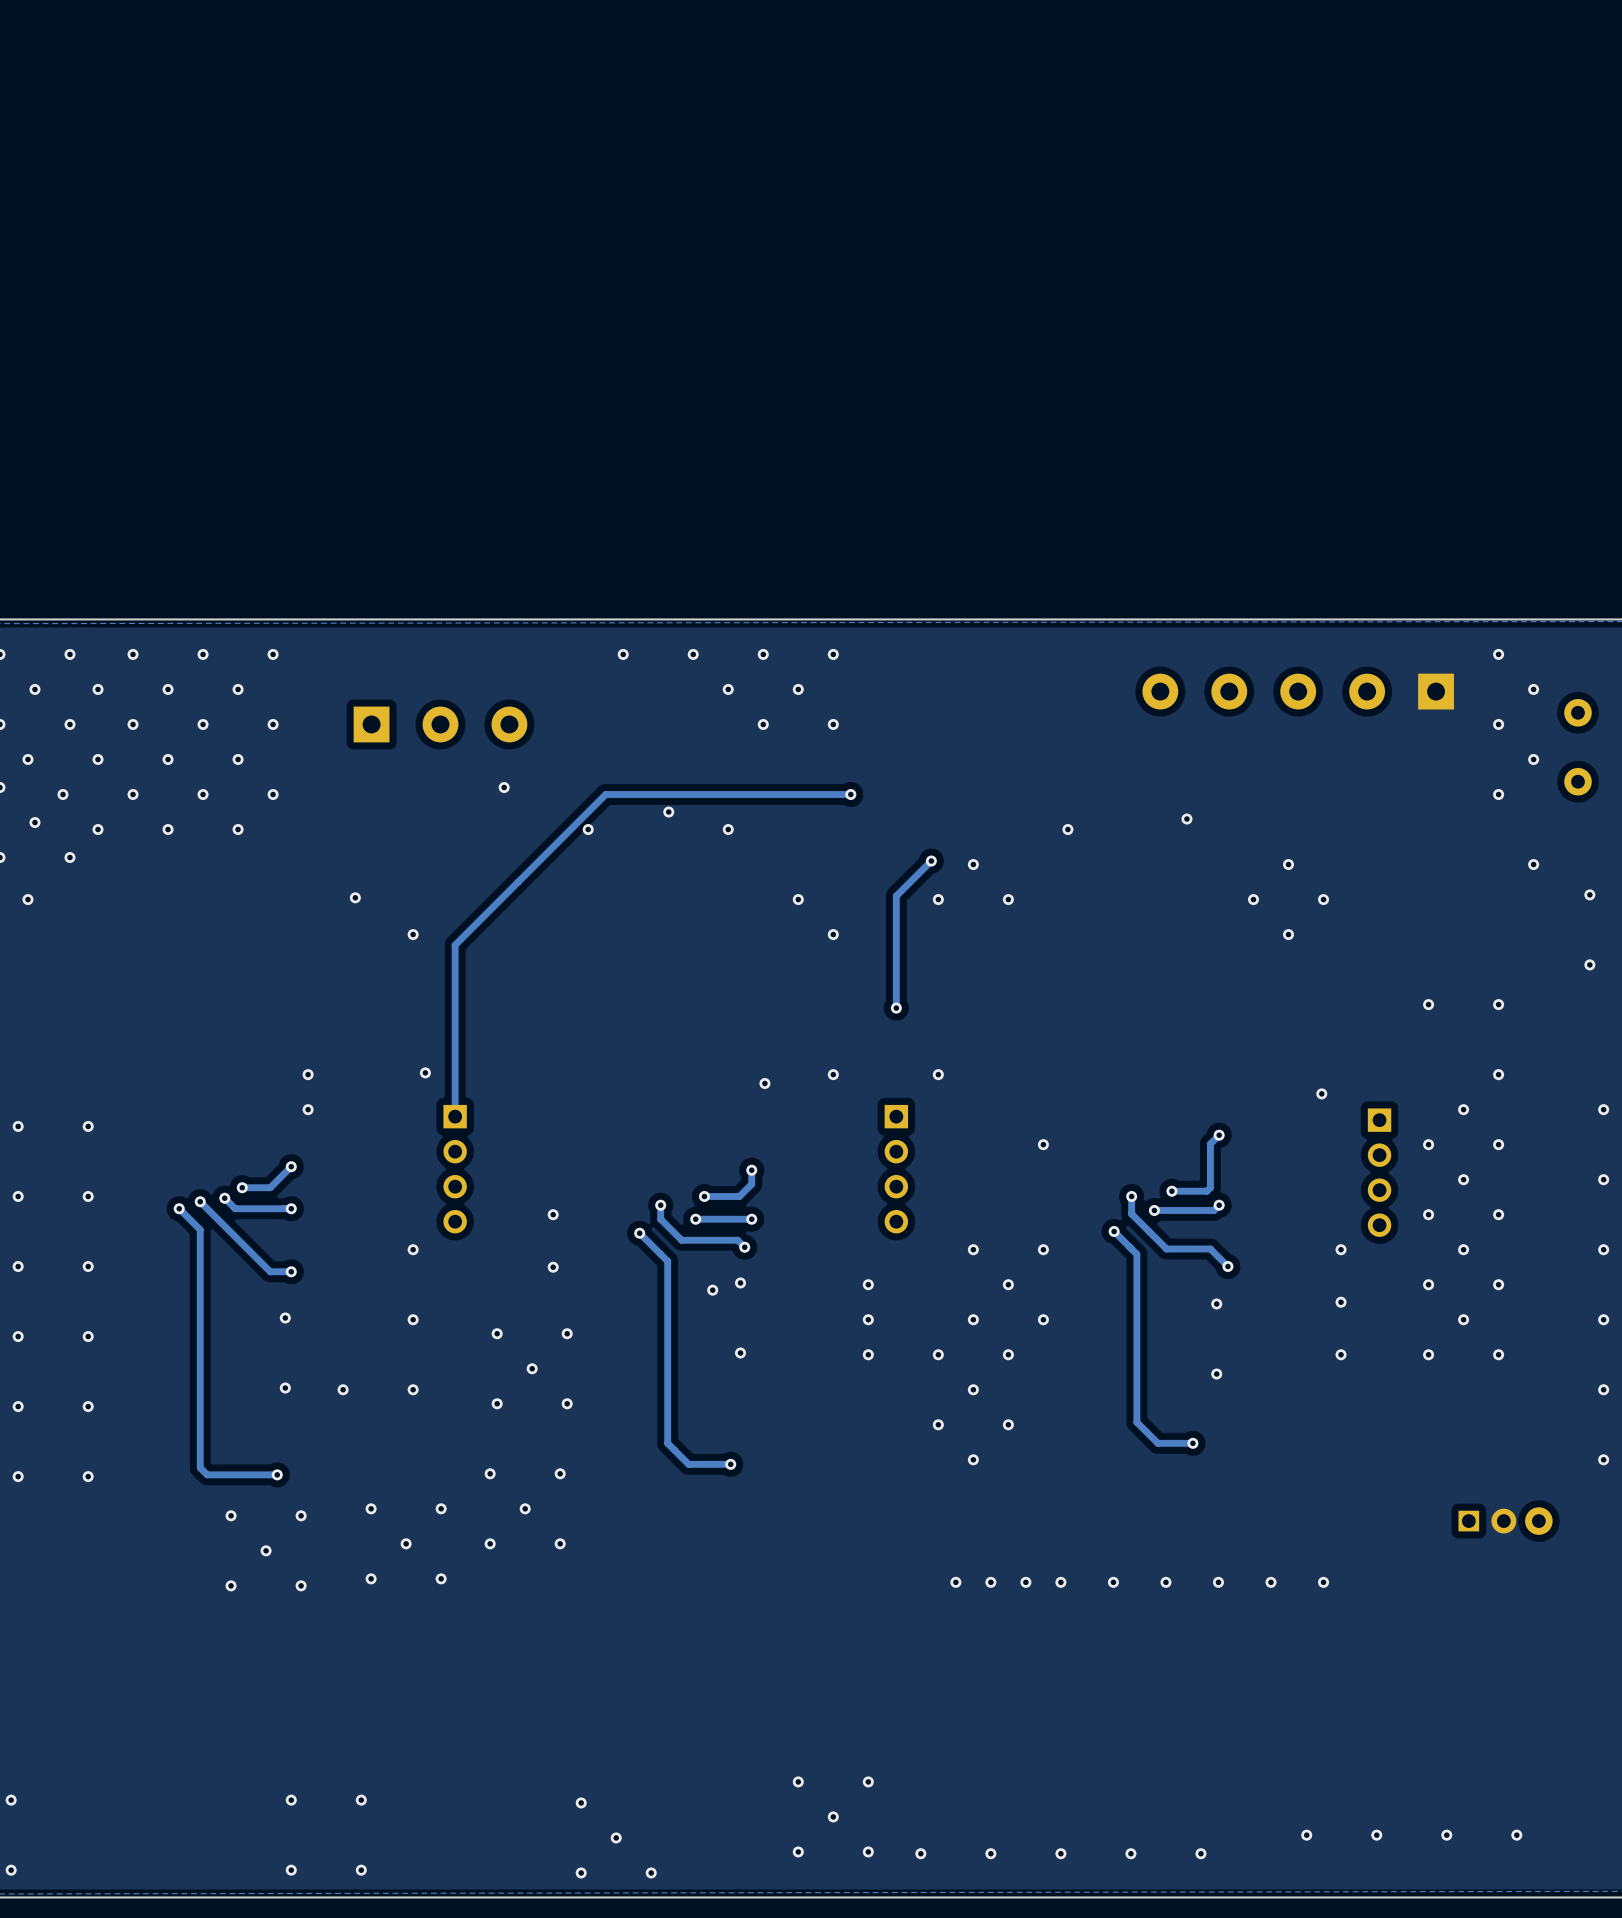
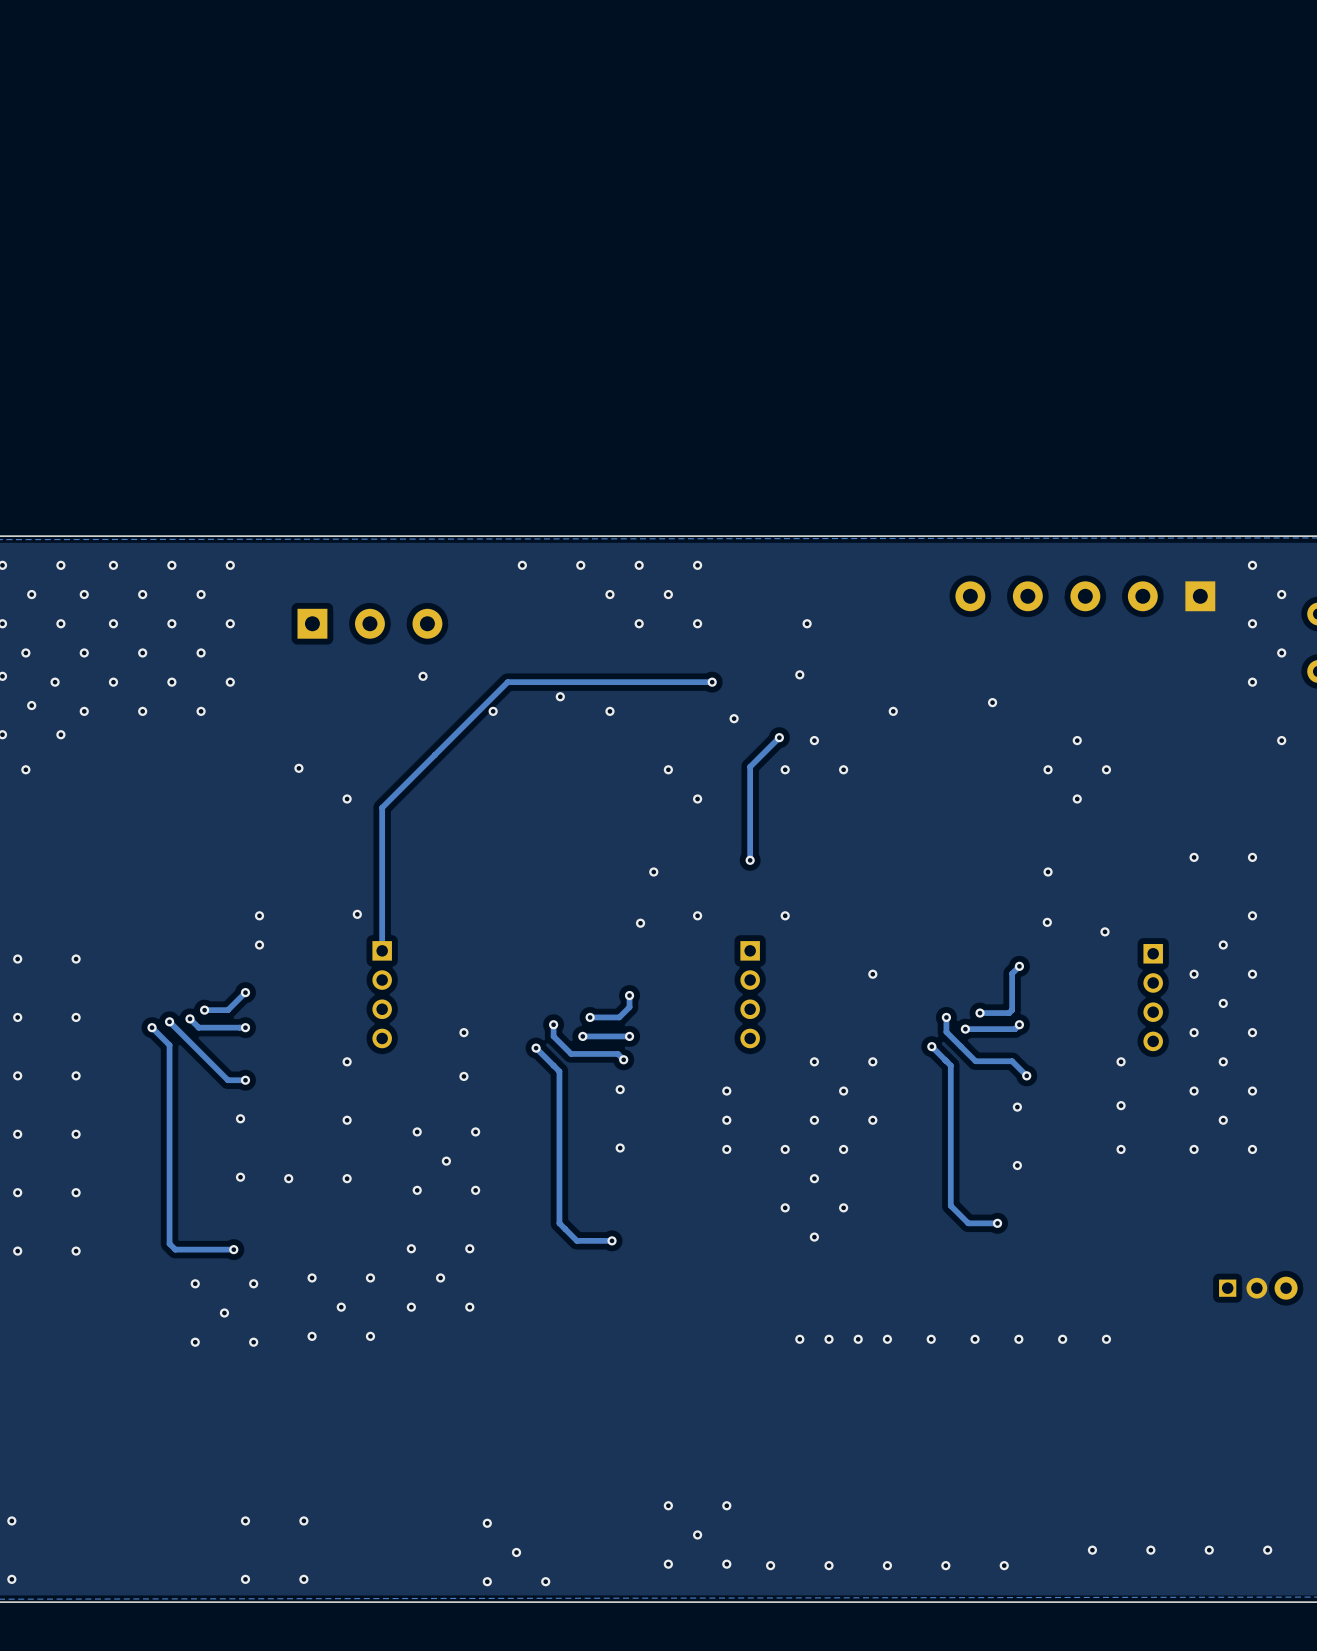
via: none -> (807, 623)
via: none -> (799, 674)
via: none -> (734, 718)
via: none -> (653, 872)
via: none -> (1048, 872)
via: none -> (1047, 922)
via: (712, 1290) -> none

